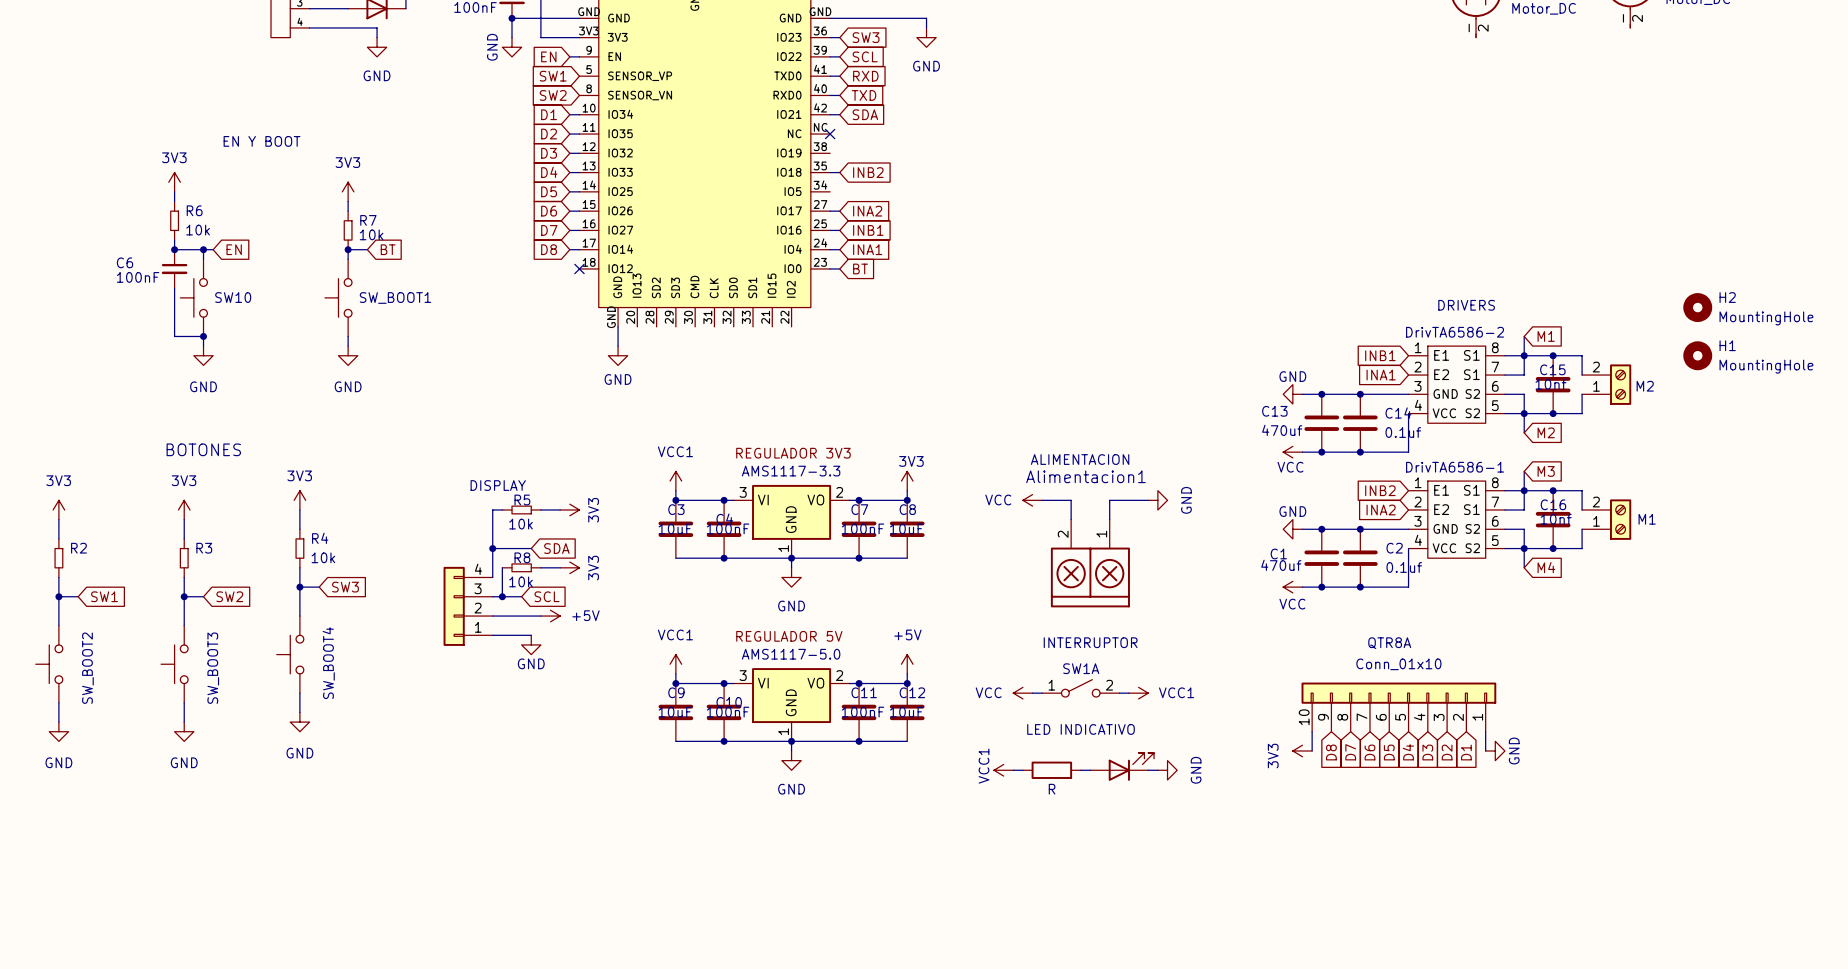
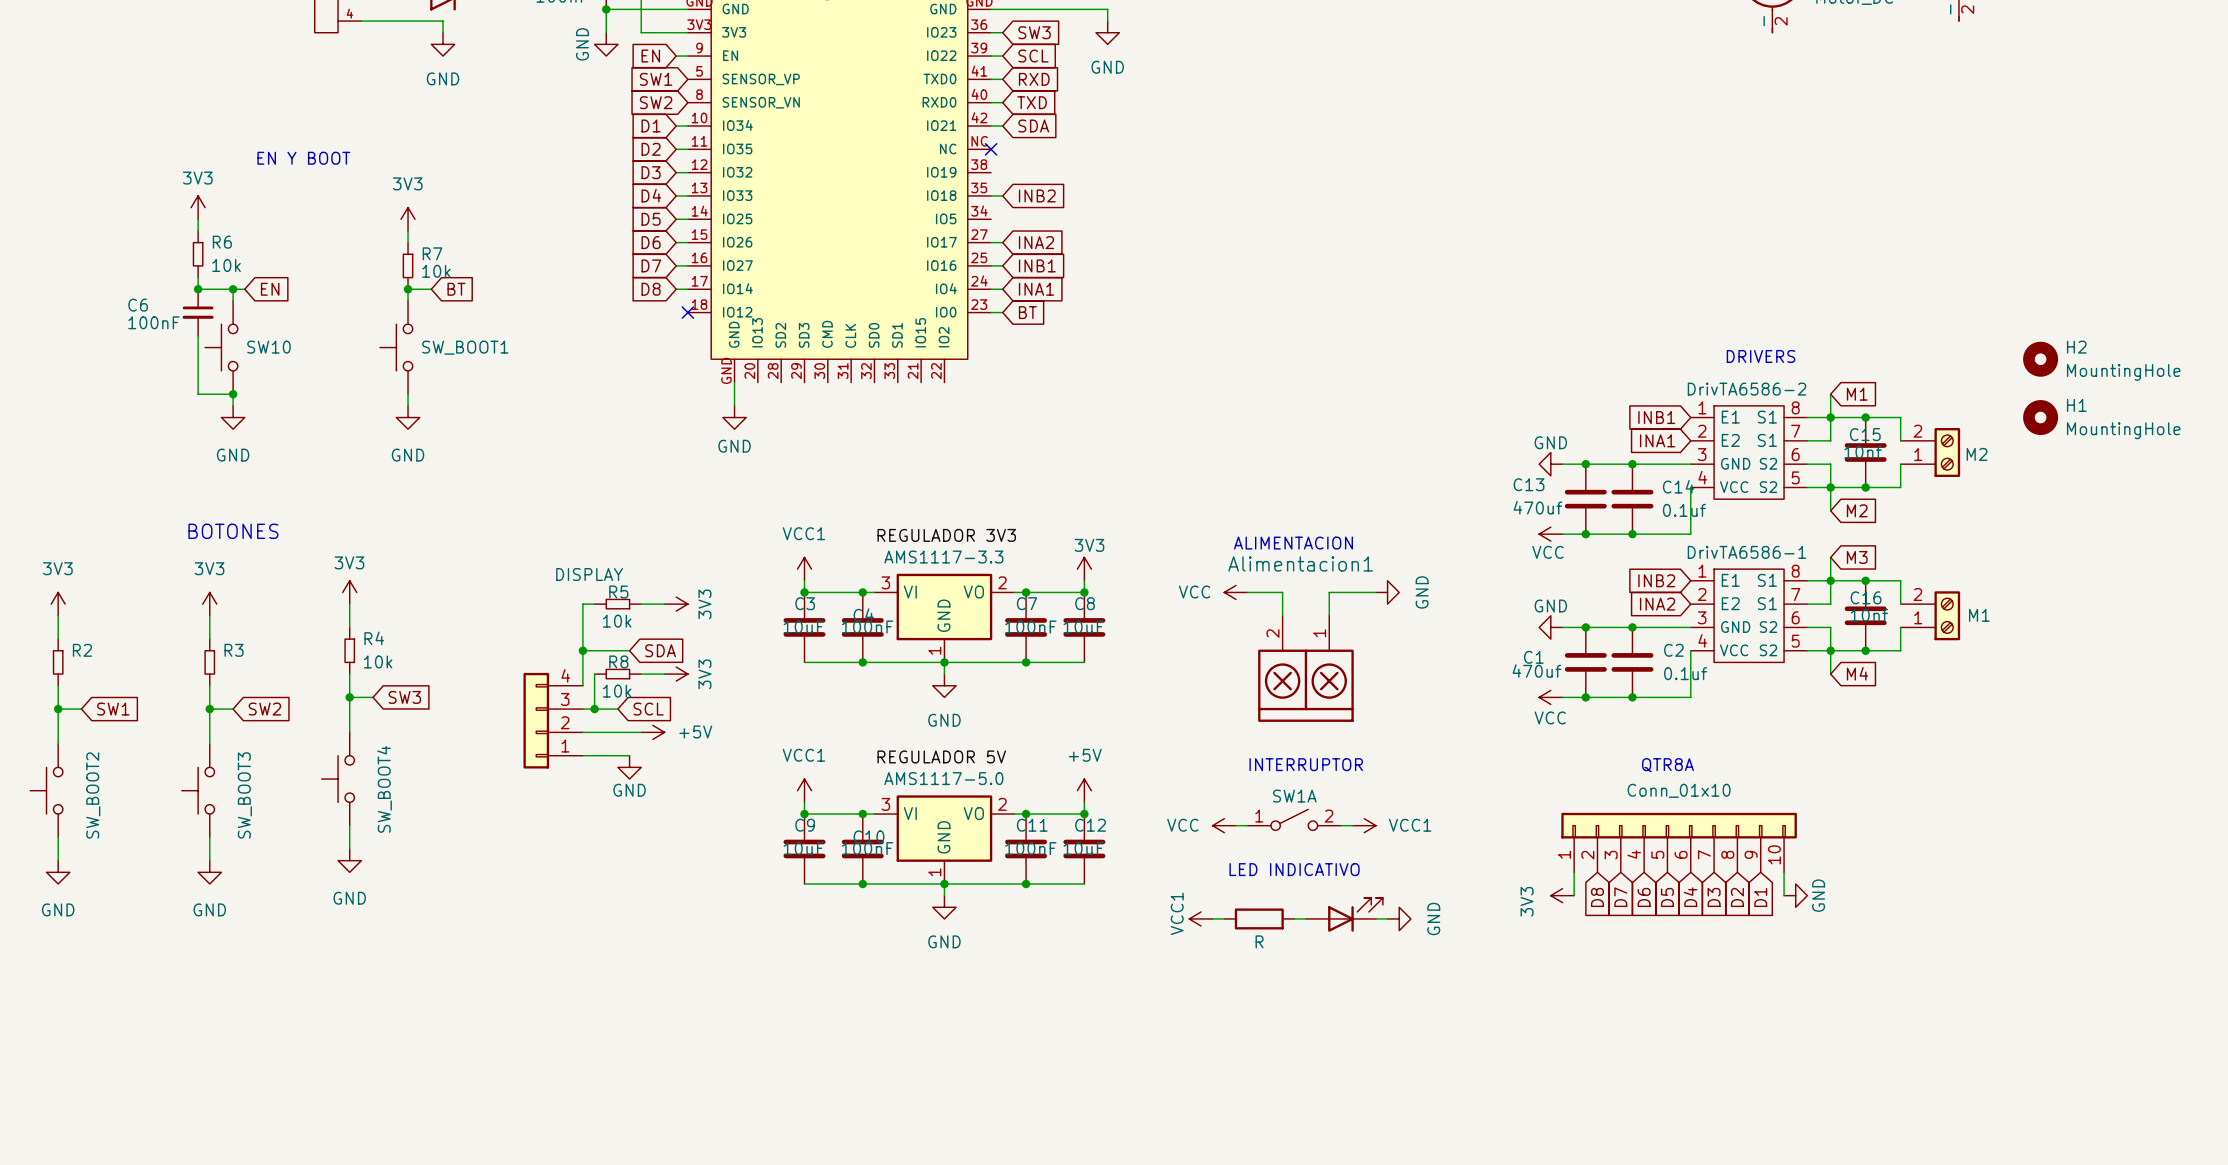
part flip: as is (1398, 693) -> left-right (1679, 825)

